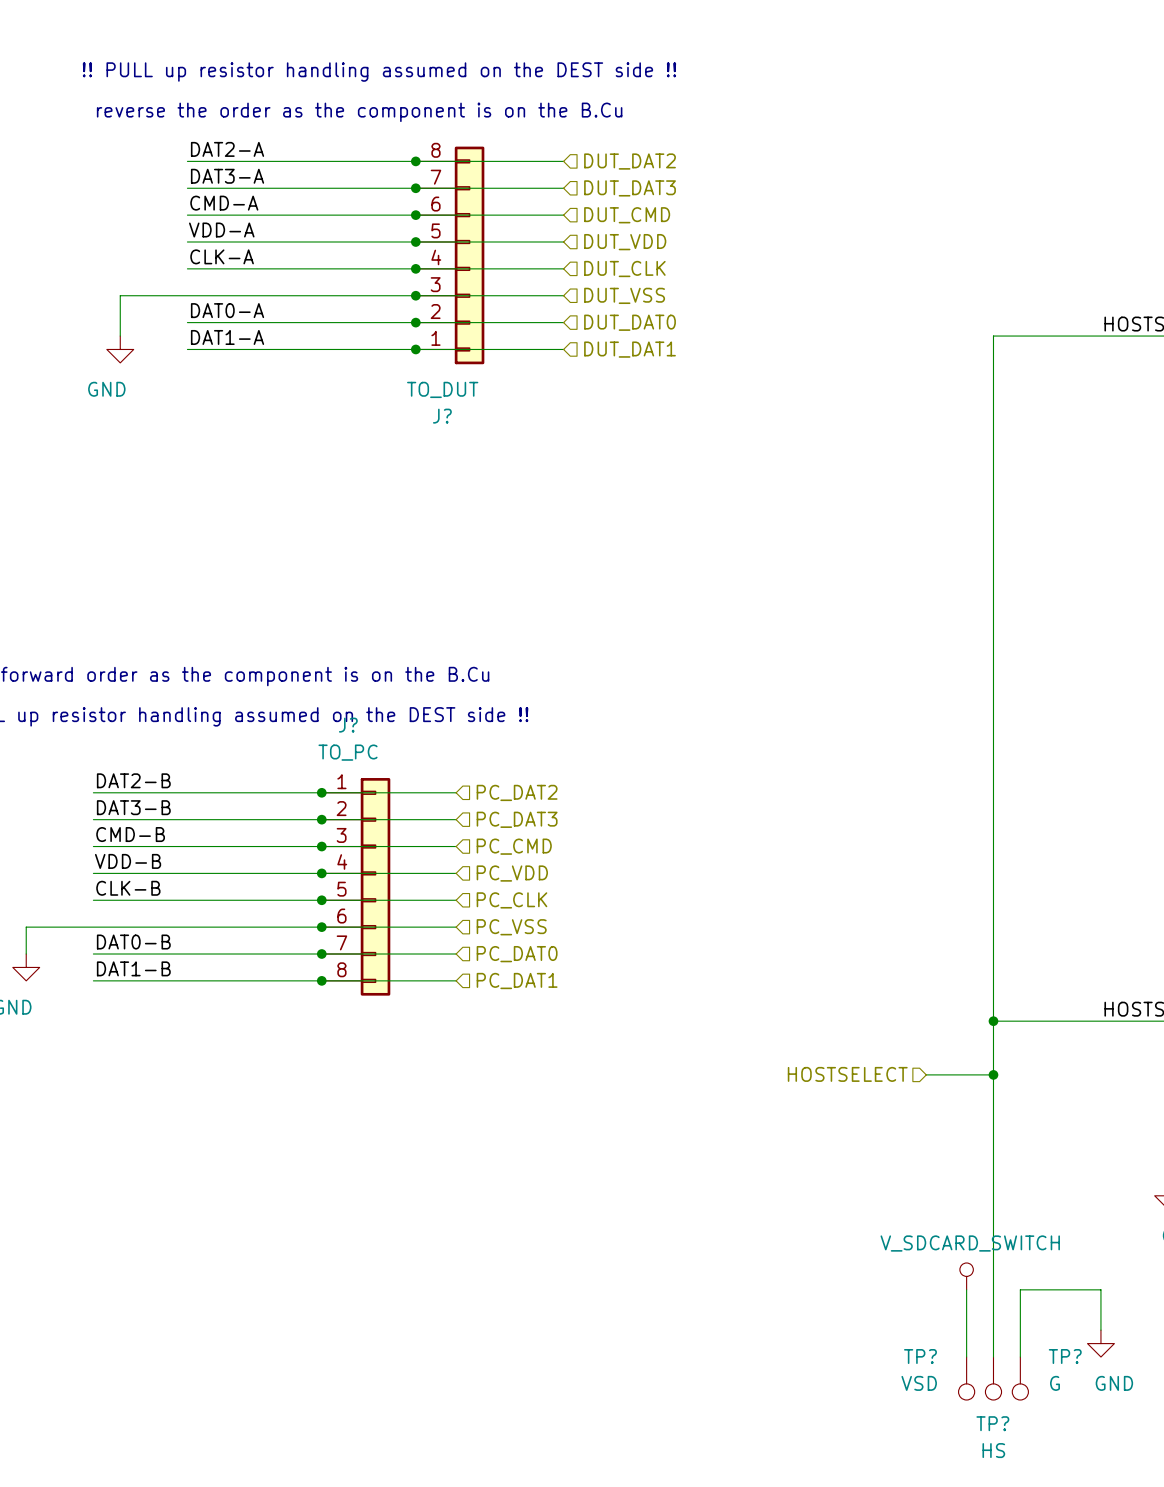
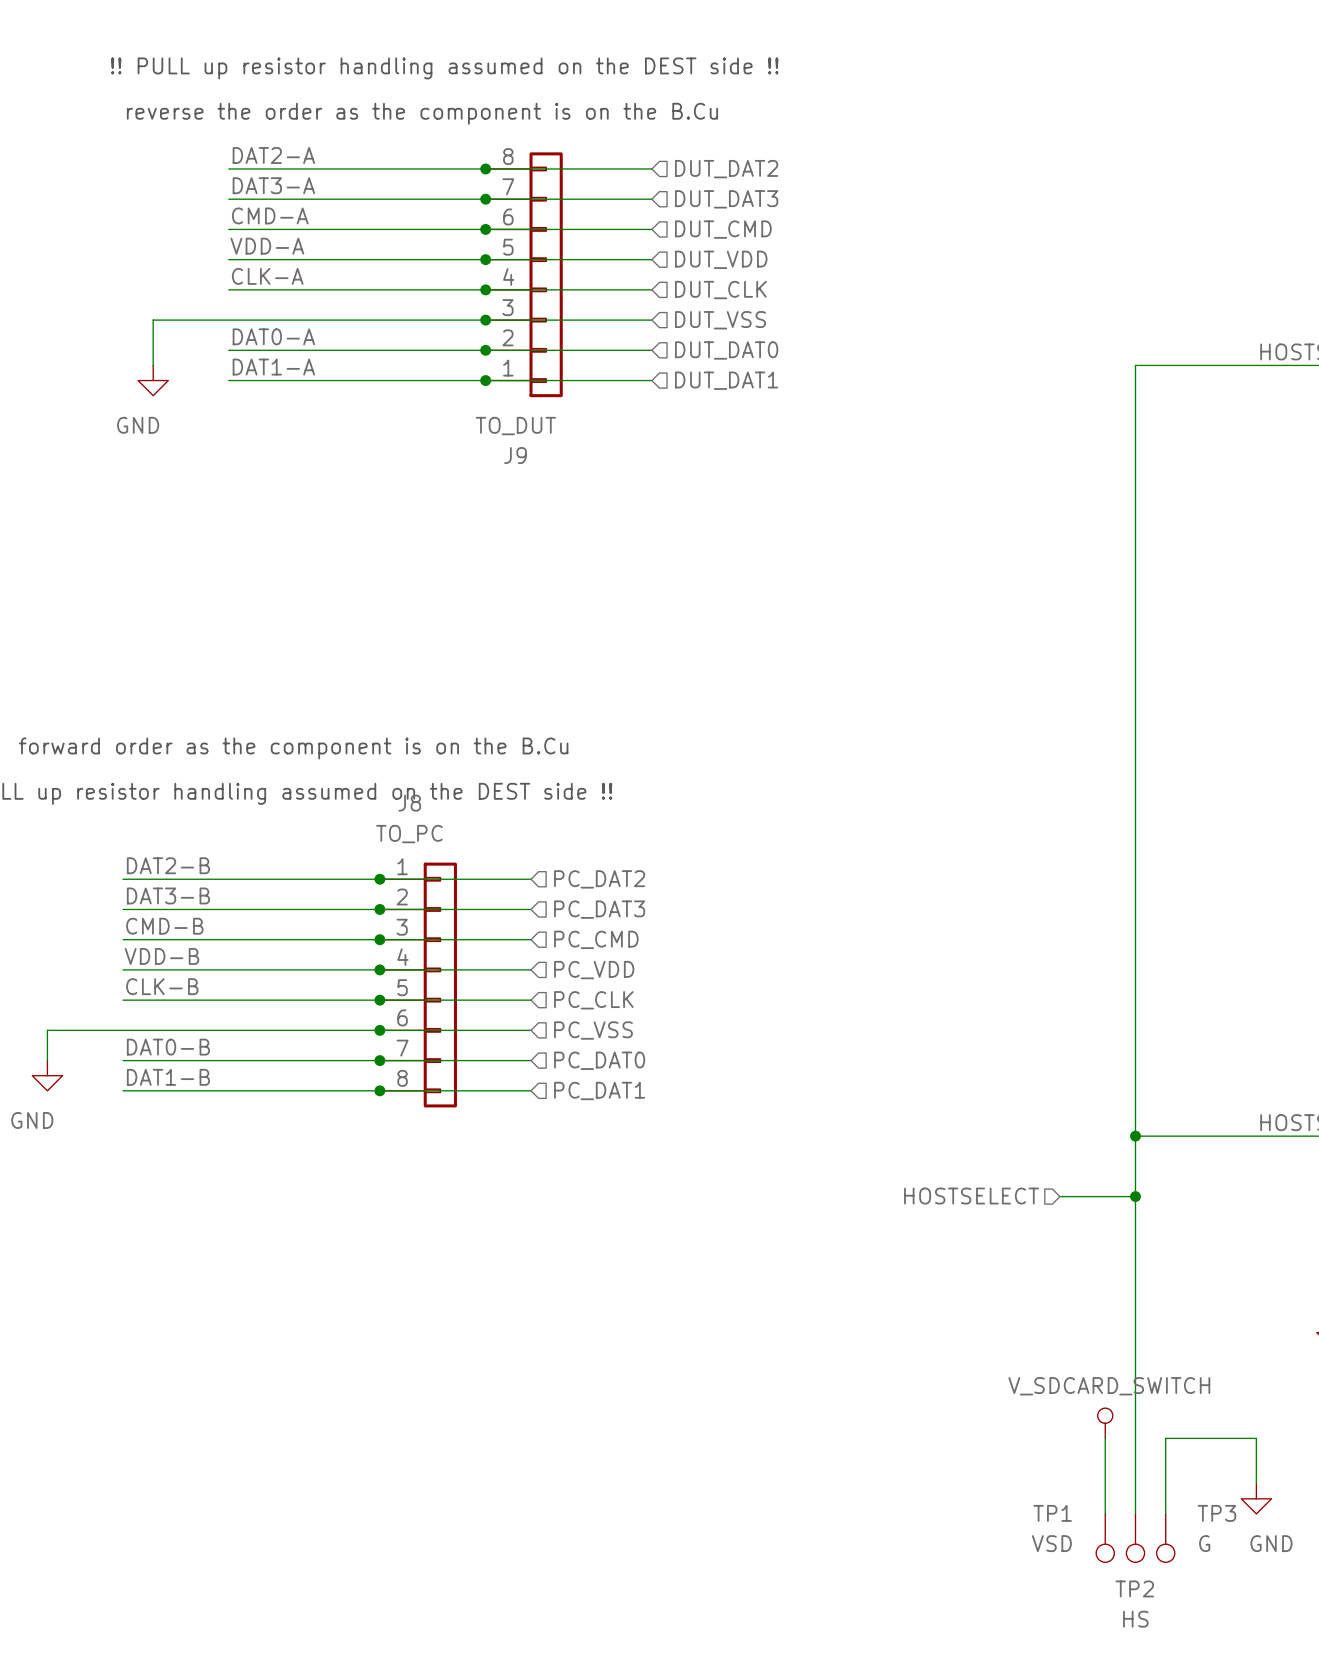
J? name: J? (442, 416) -> J9 (515, 455)
J? name: J? (348, 725) -> J8 (409, 803)
TP? name: TP? (920, 1356) -> TP1 (1052, 1513)
TP? name: TP? (1065, 1356) -> TP3 (1216, 1513)
TP? name: TP? (992, 1423) -> TP2 (1134, 1588)

